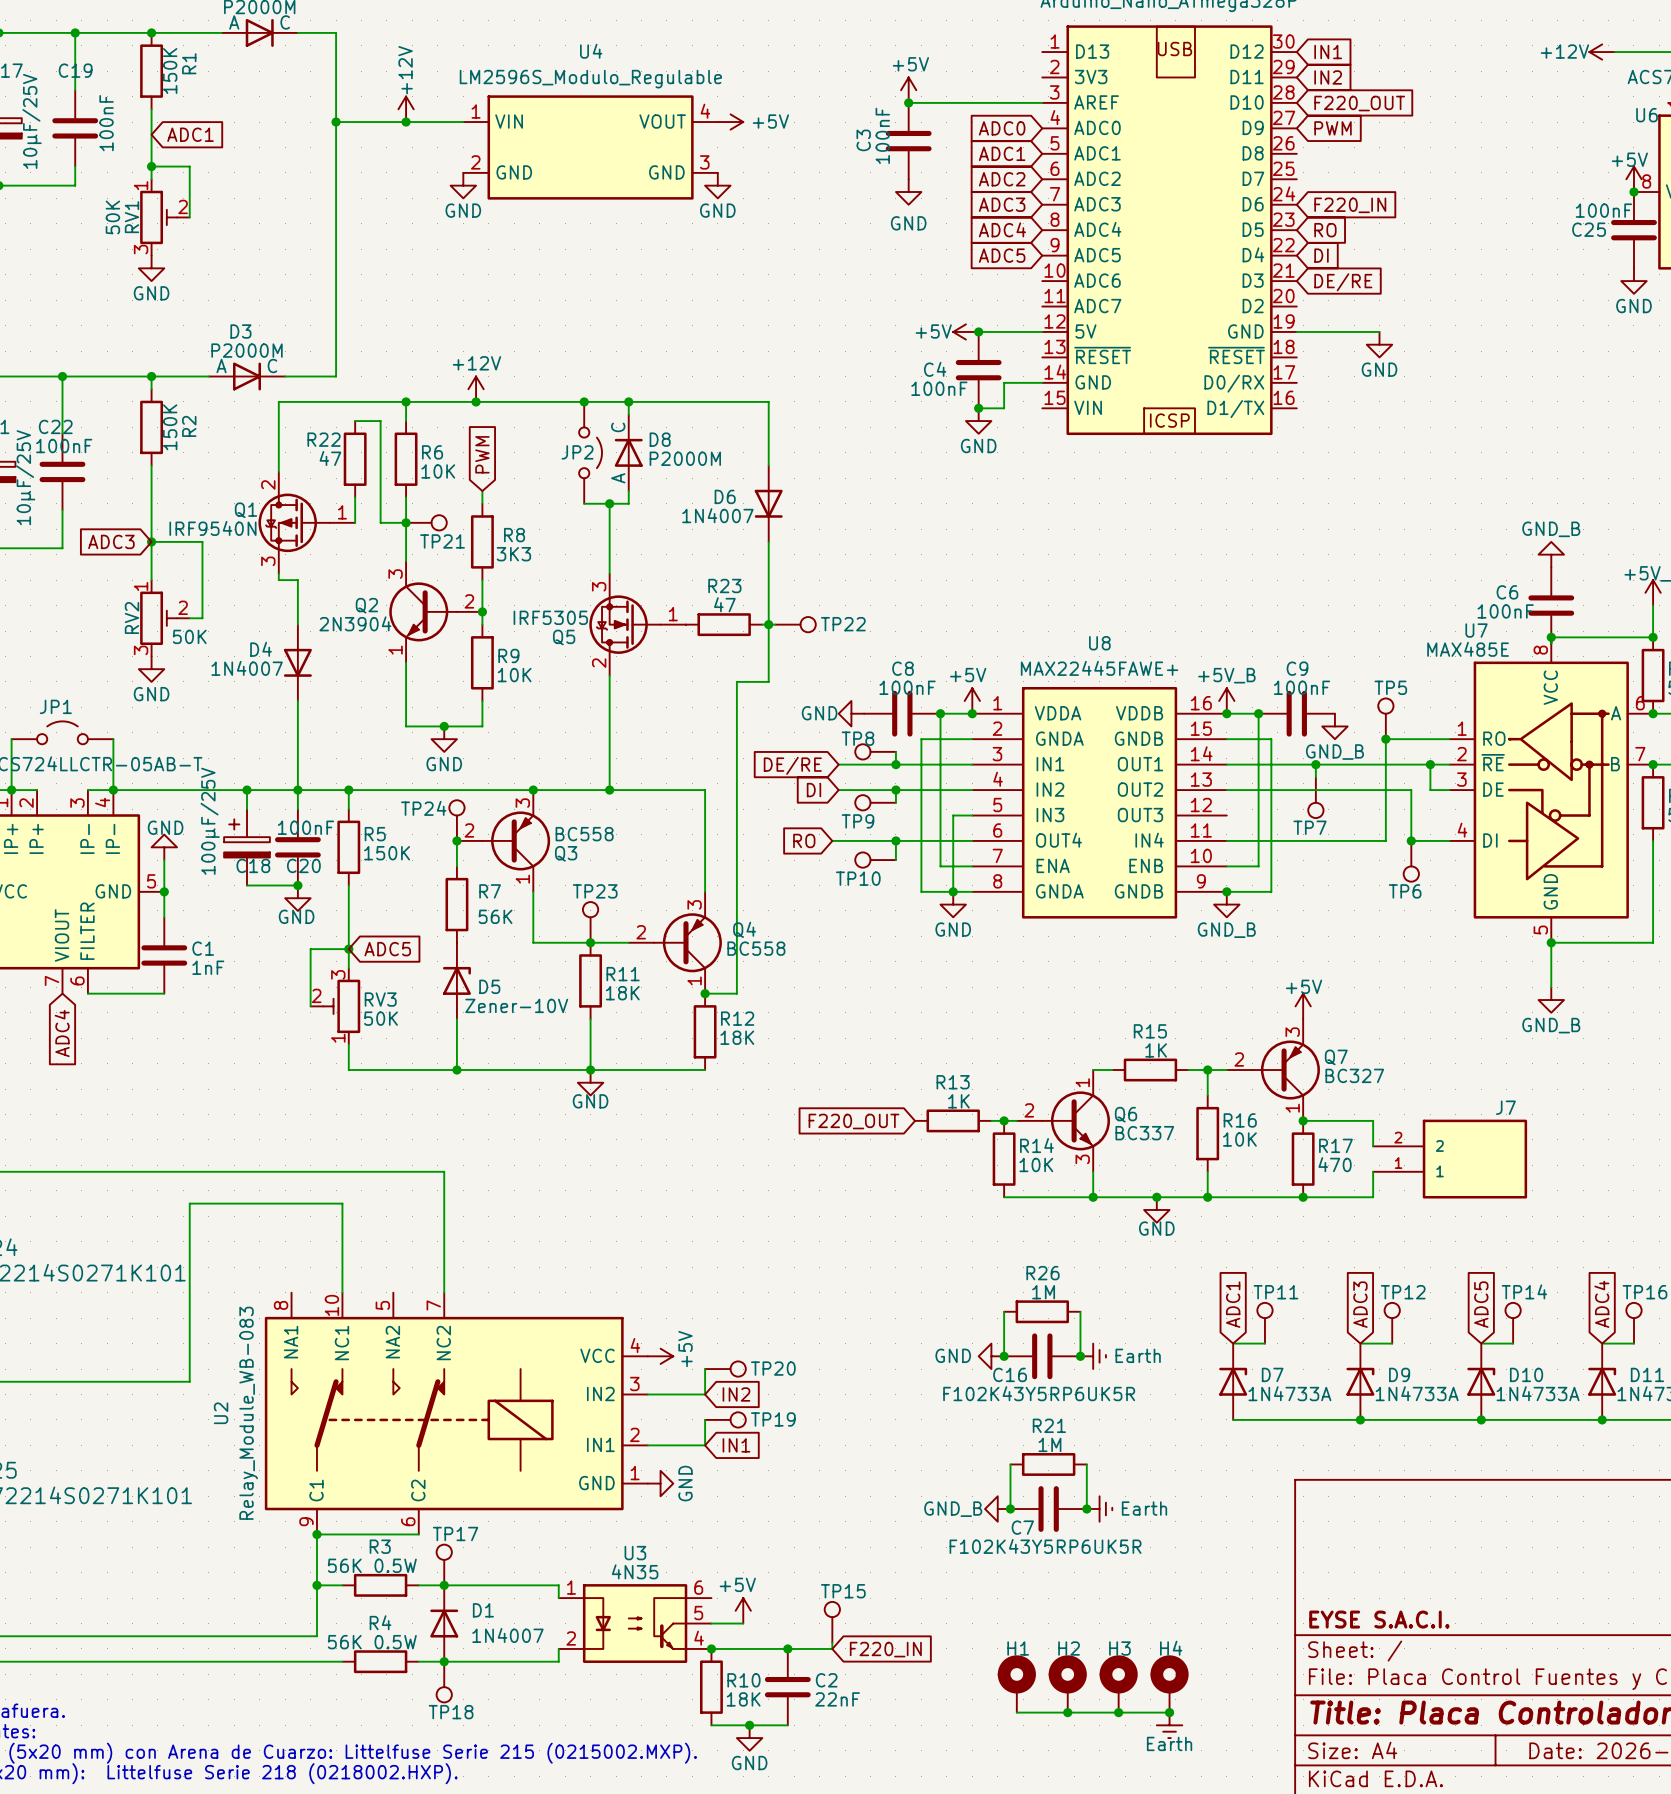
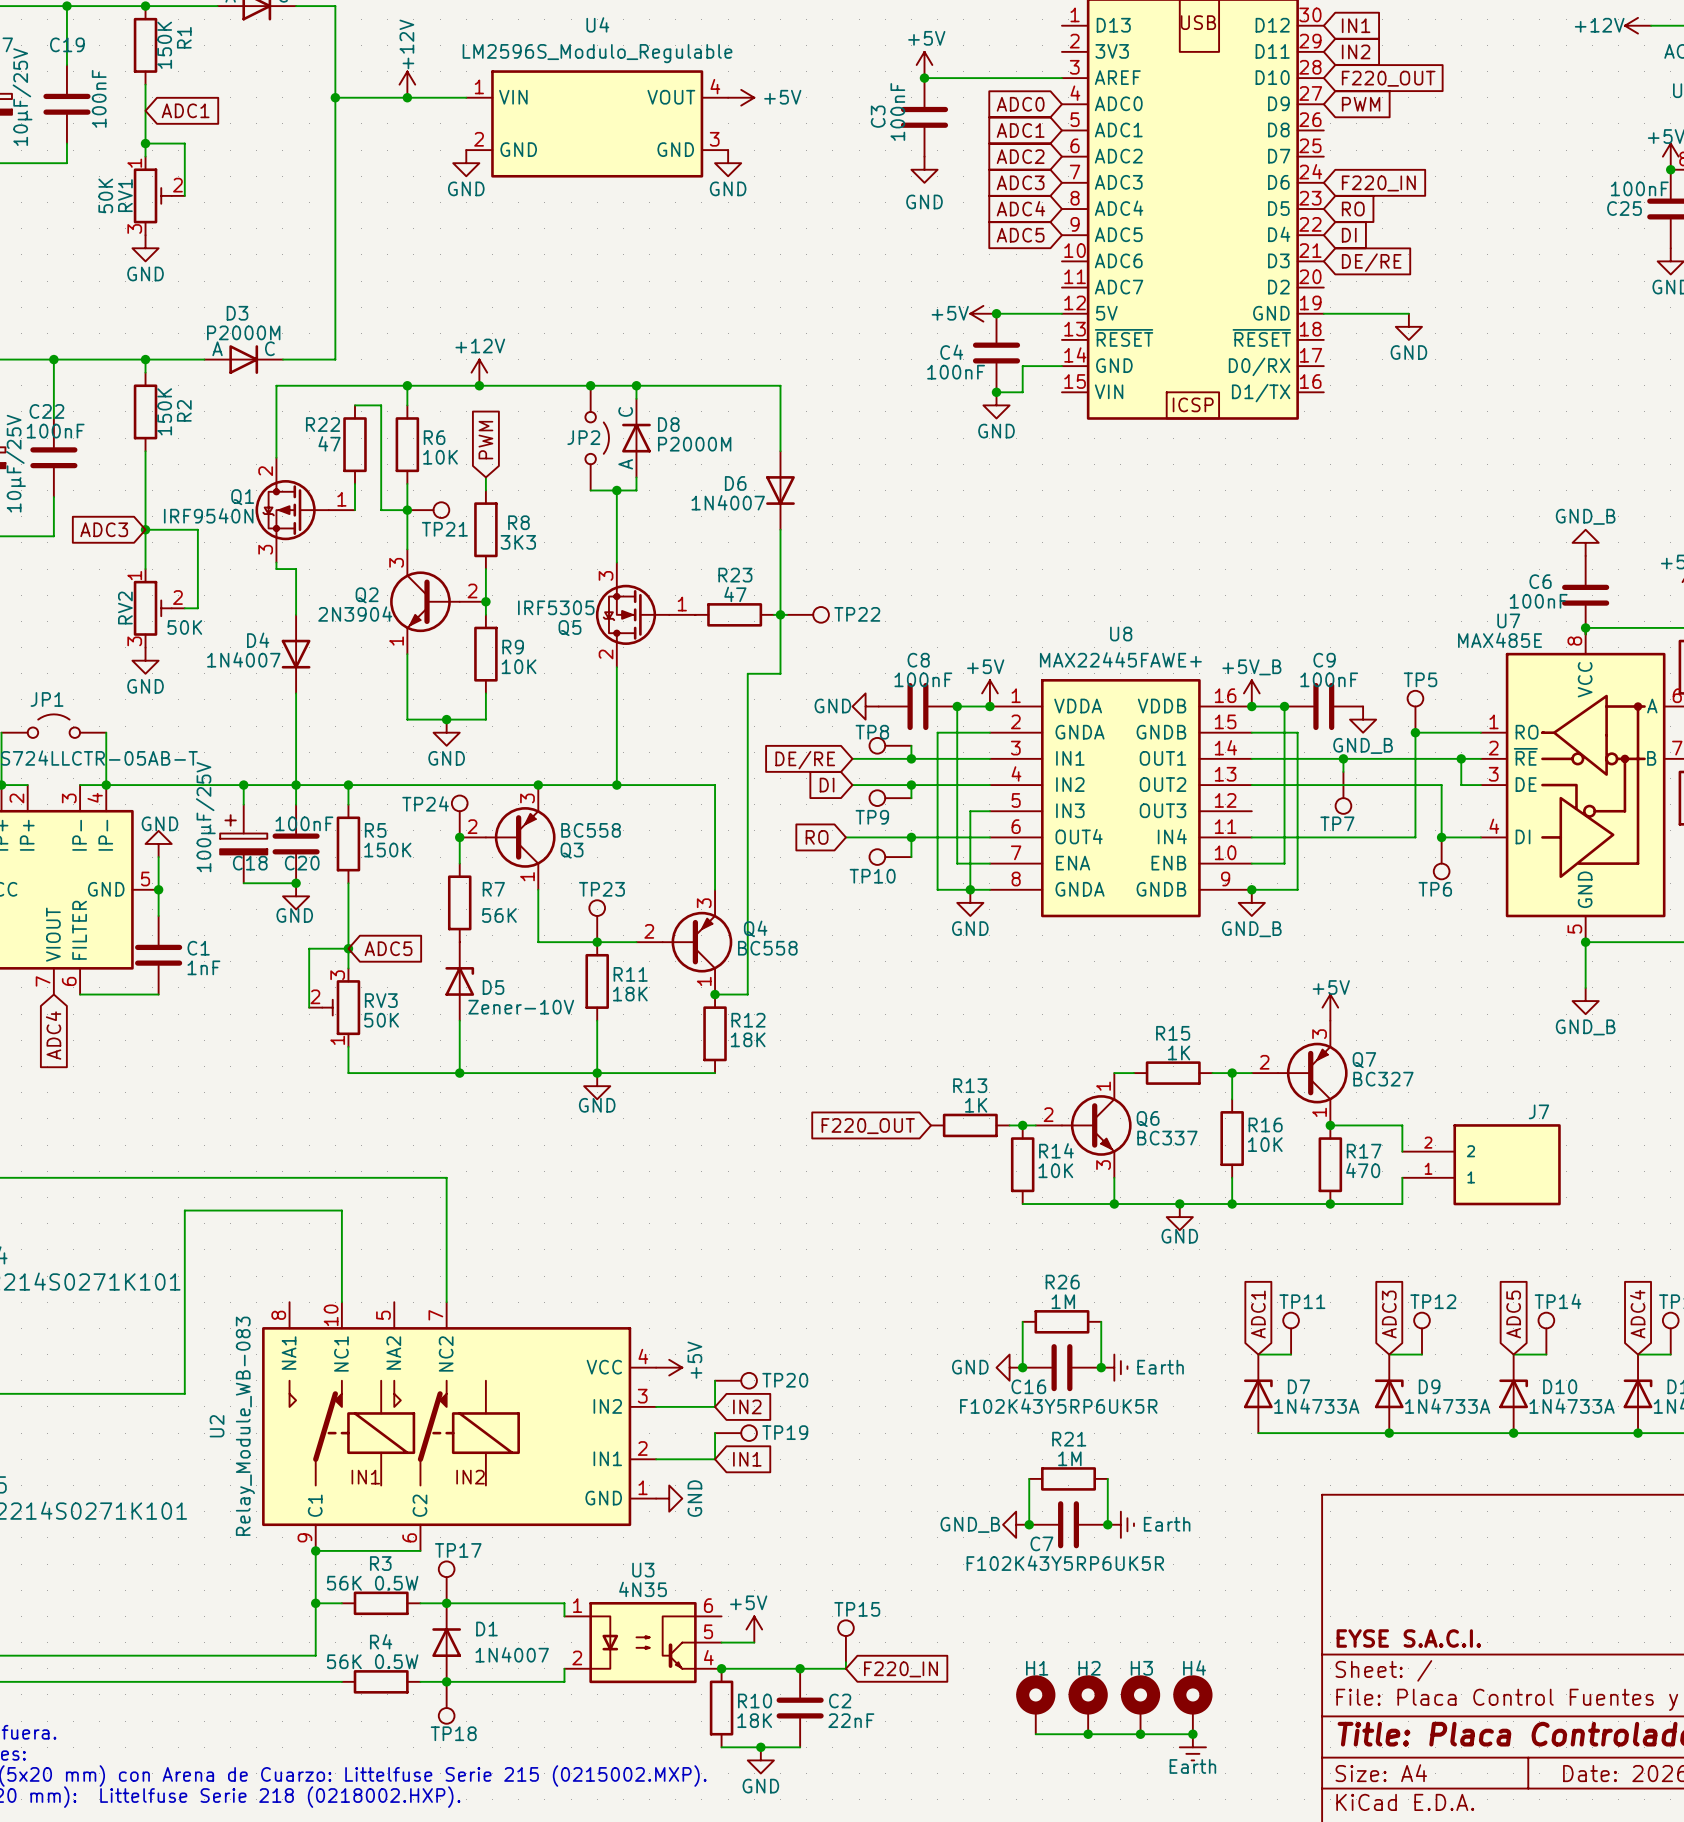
U2 symbol: [264, 1292, 648, 1535] -> [262, 1302, 657, 1551]

